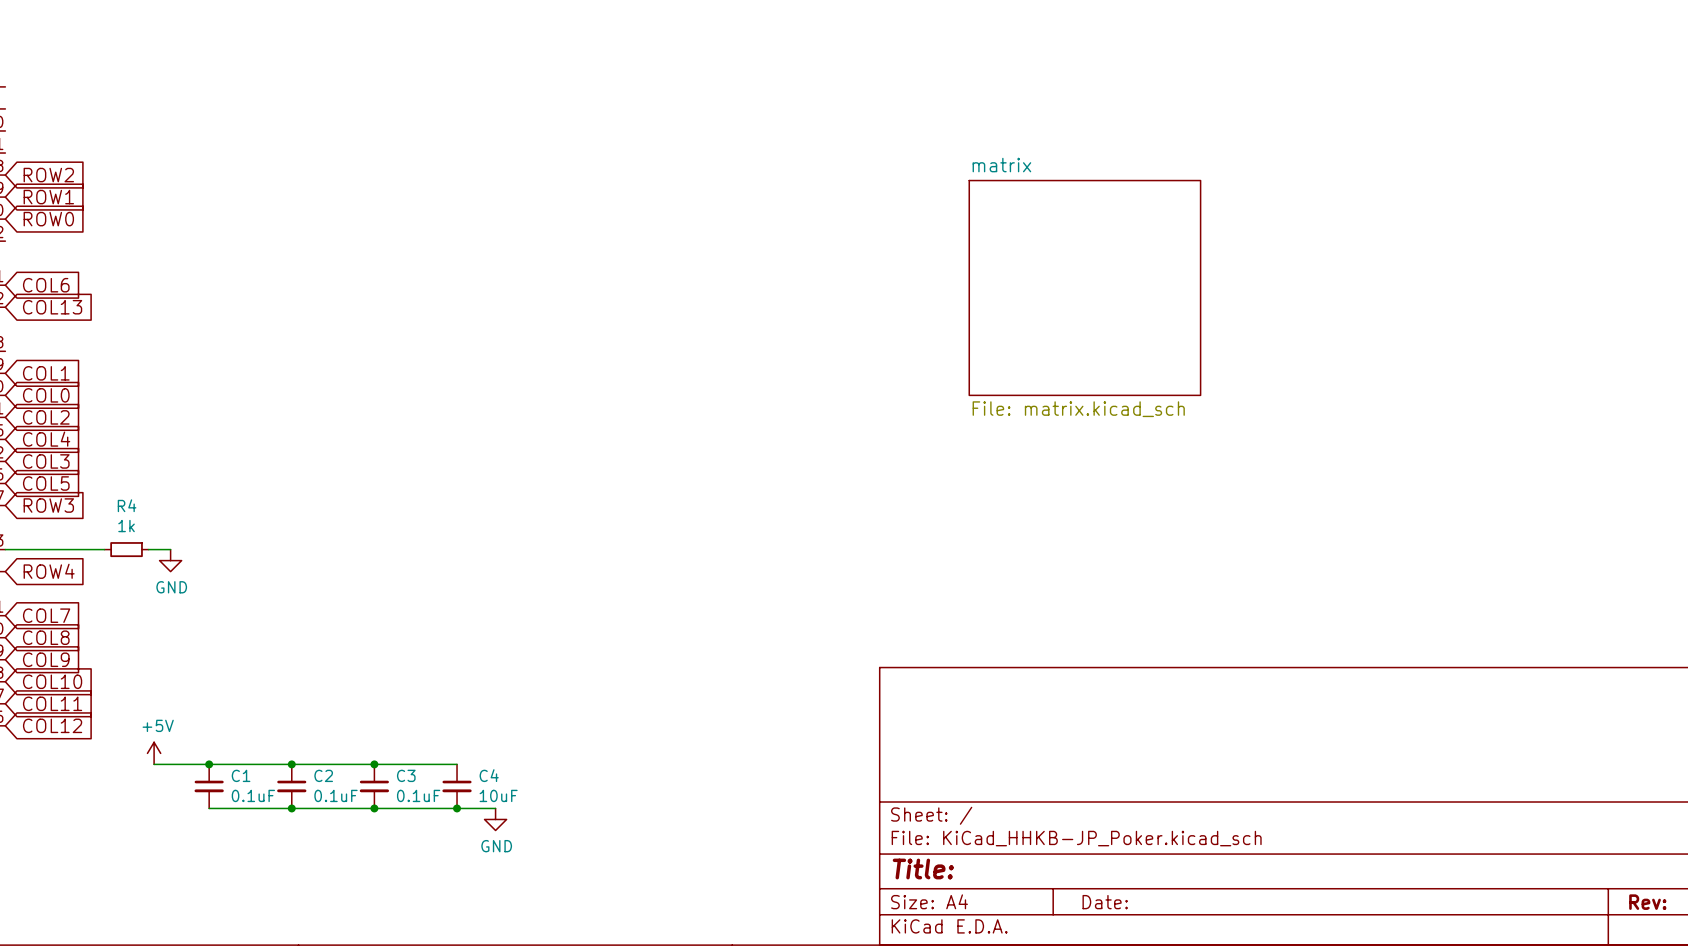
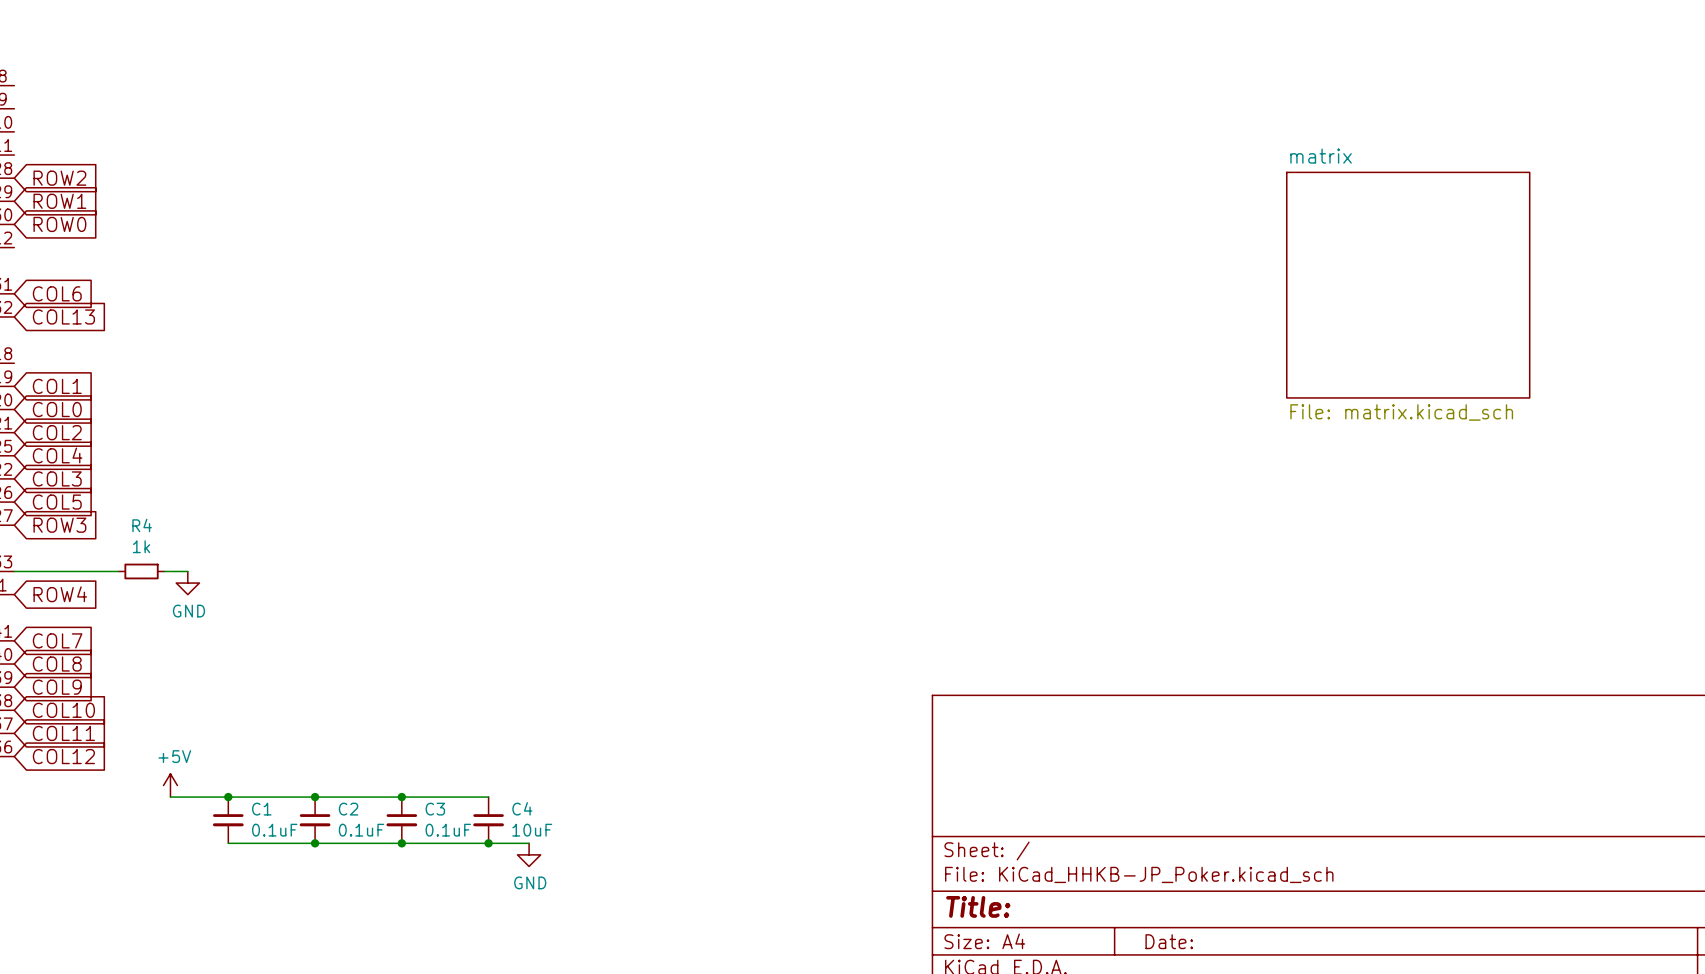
sheet matrix: none -> File: matrix.kicad_sch (1408, 285)
sheet matrix: File: matrix.kicad_sch (1084, 287) -> none

